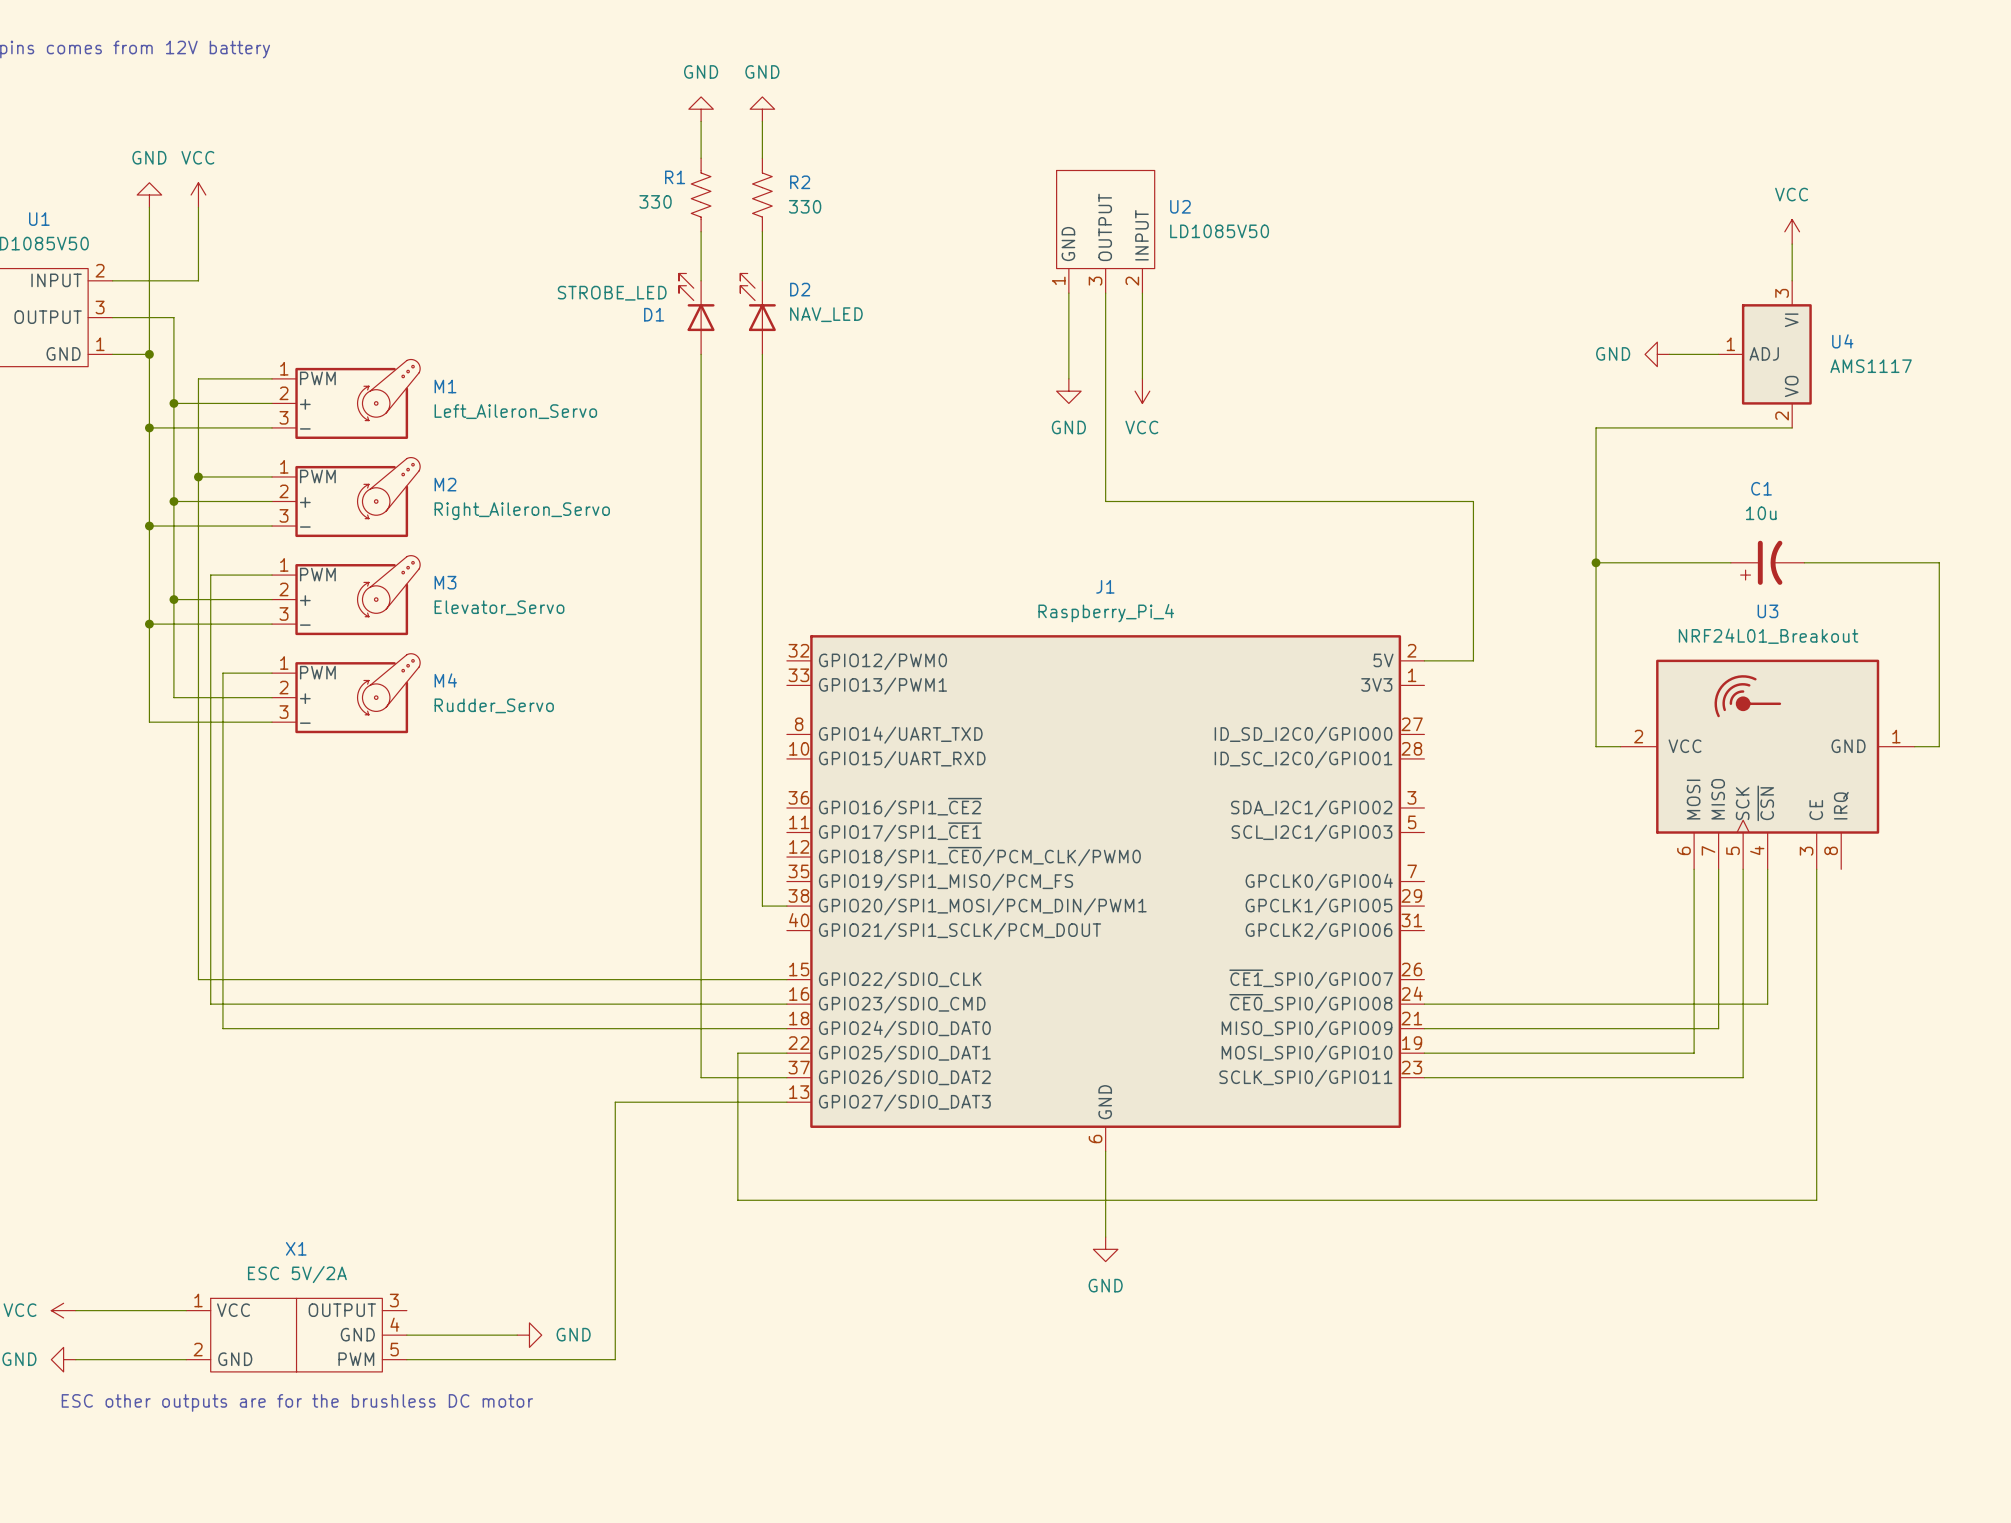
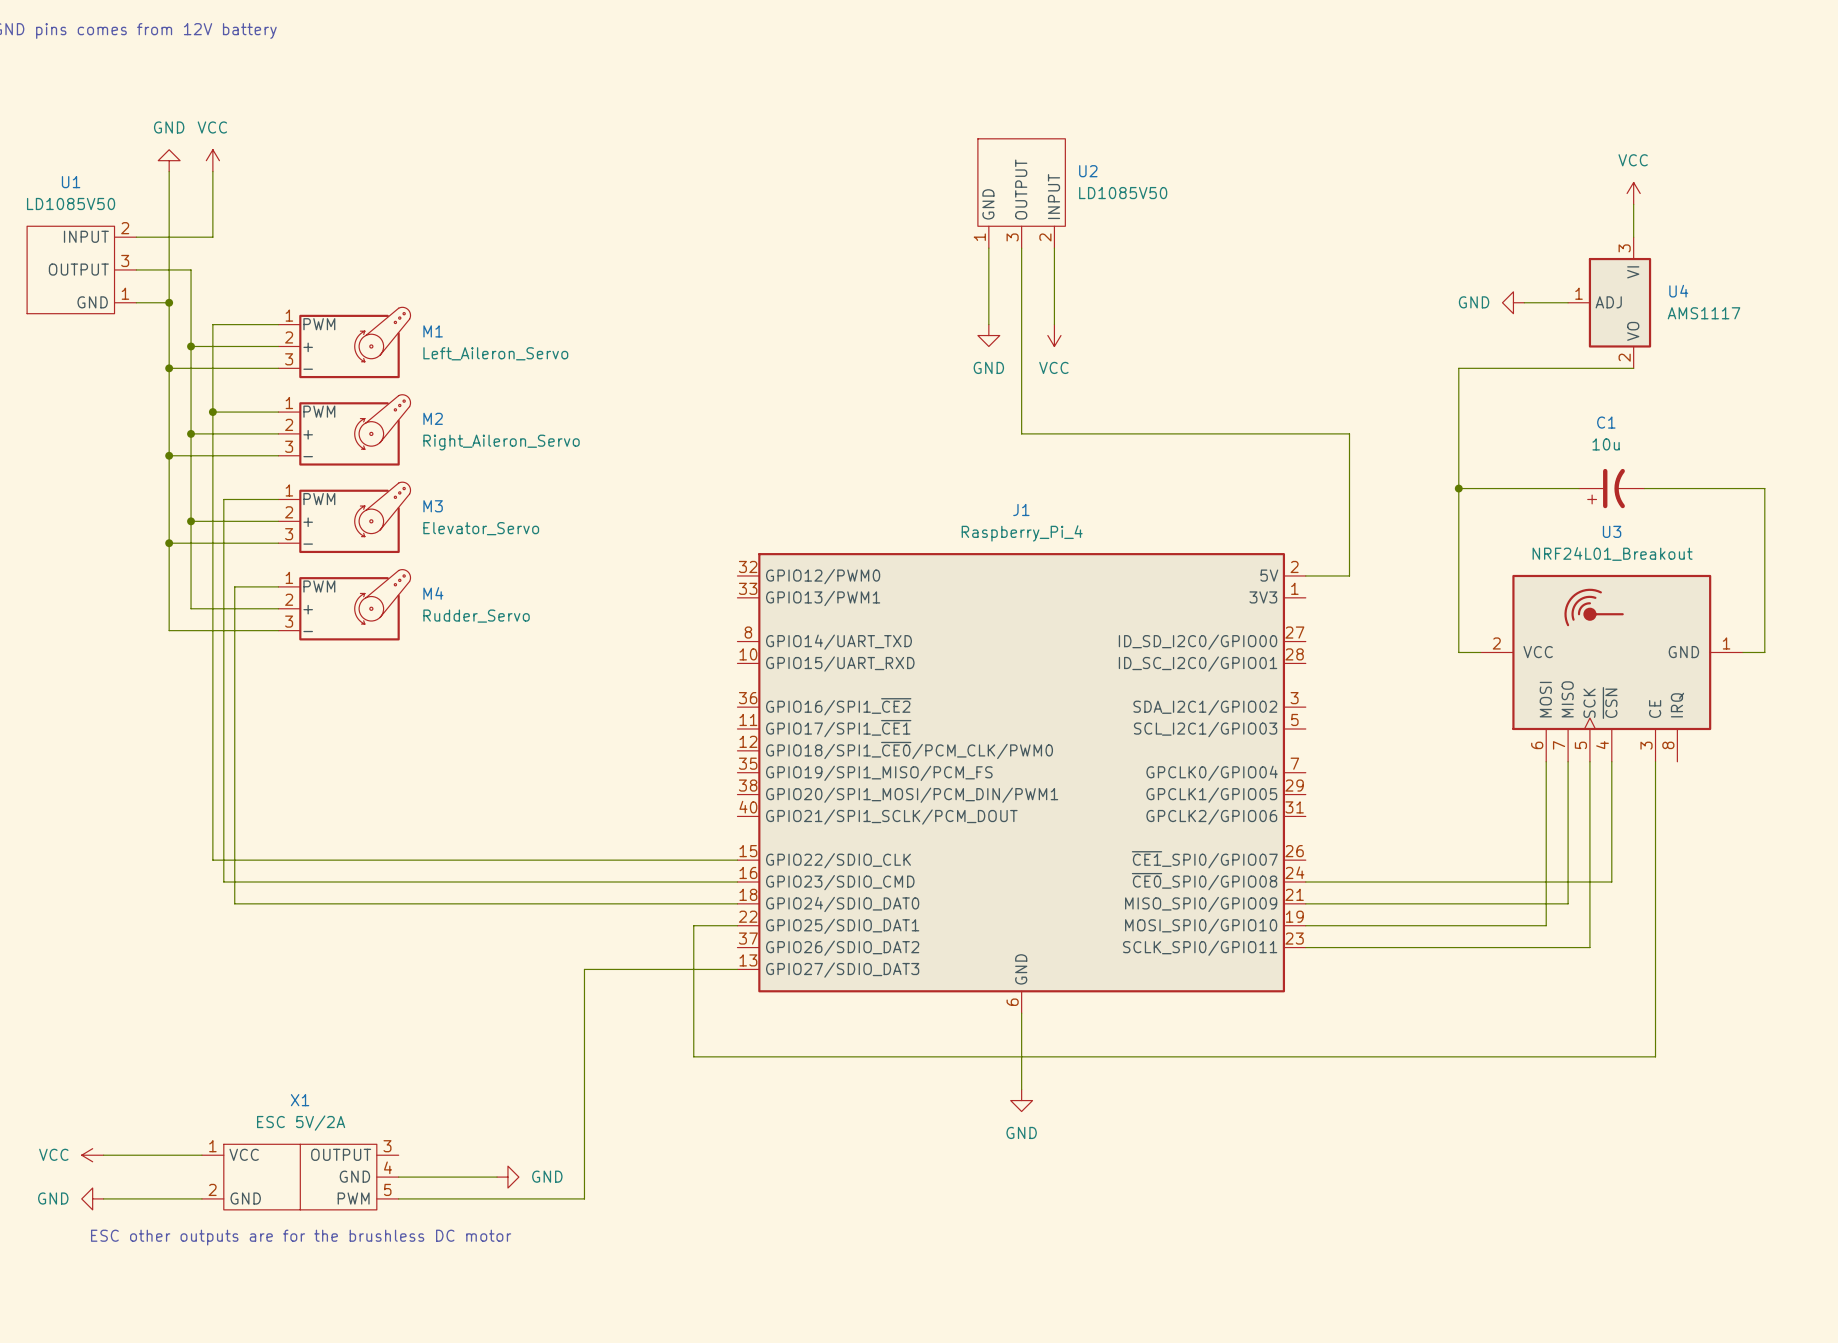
power symbol: GND (701, 109) -> none
power symbol: GND (762, 109) -> none
wire: (701, 121) (701, 158) -> none
wire: (762, 121) (762, 158) -> none
R1: 330 (701, 195) -> none
R2: 330 (762, 195) -> none
wire: (701, 231) (701, 280) -> none
wire: (762, 231) (762, 280) -> none
D1: STROBE_LED (696, 313) -> none
D2: NAV_LED (758, 313) -> none
wire: (701, 354) (701, 1077) (786, 1077) -> none
wire: (762, 354) (762, 906) (786, 906) -> none

